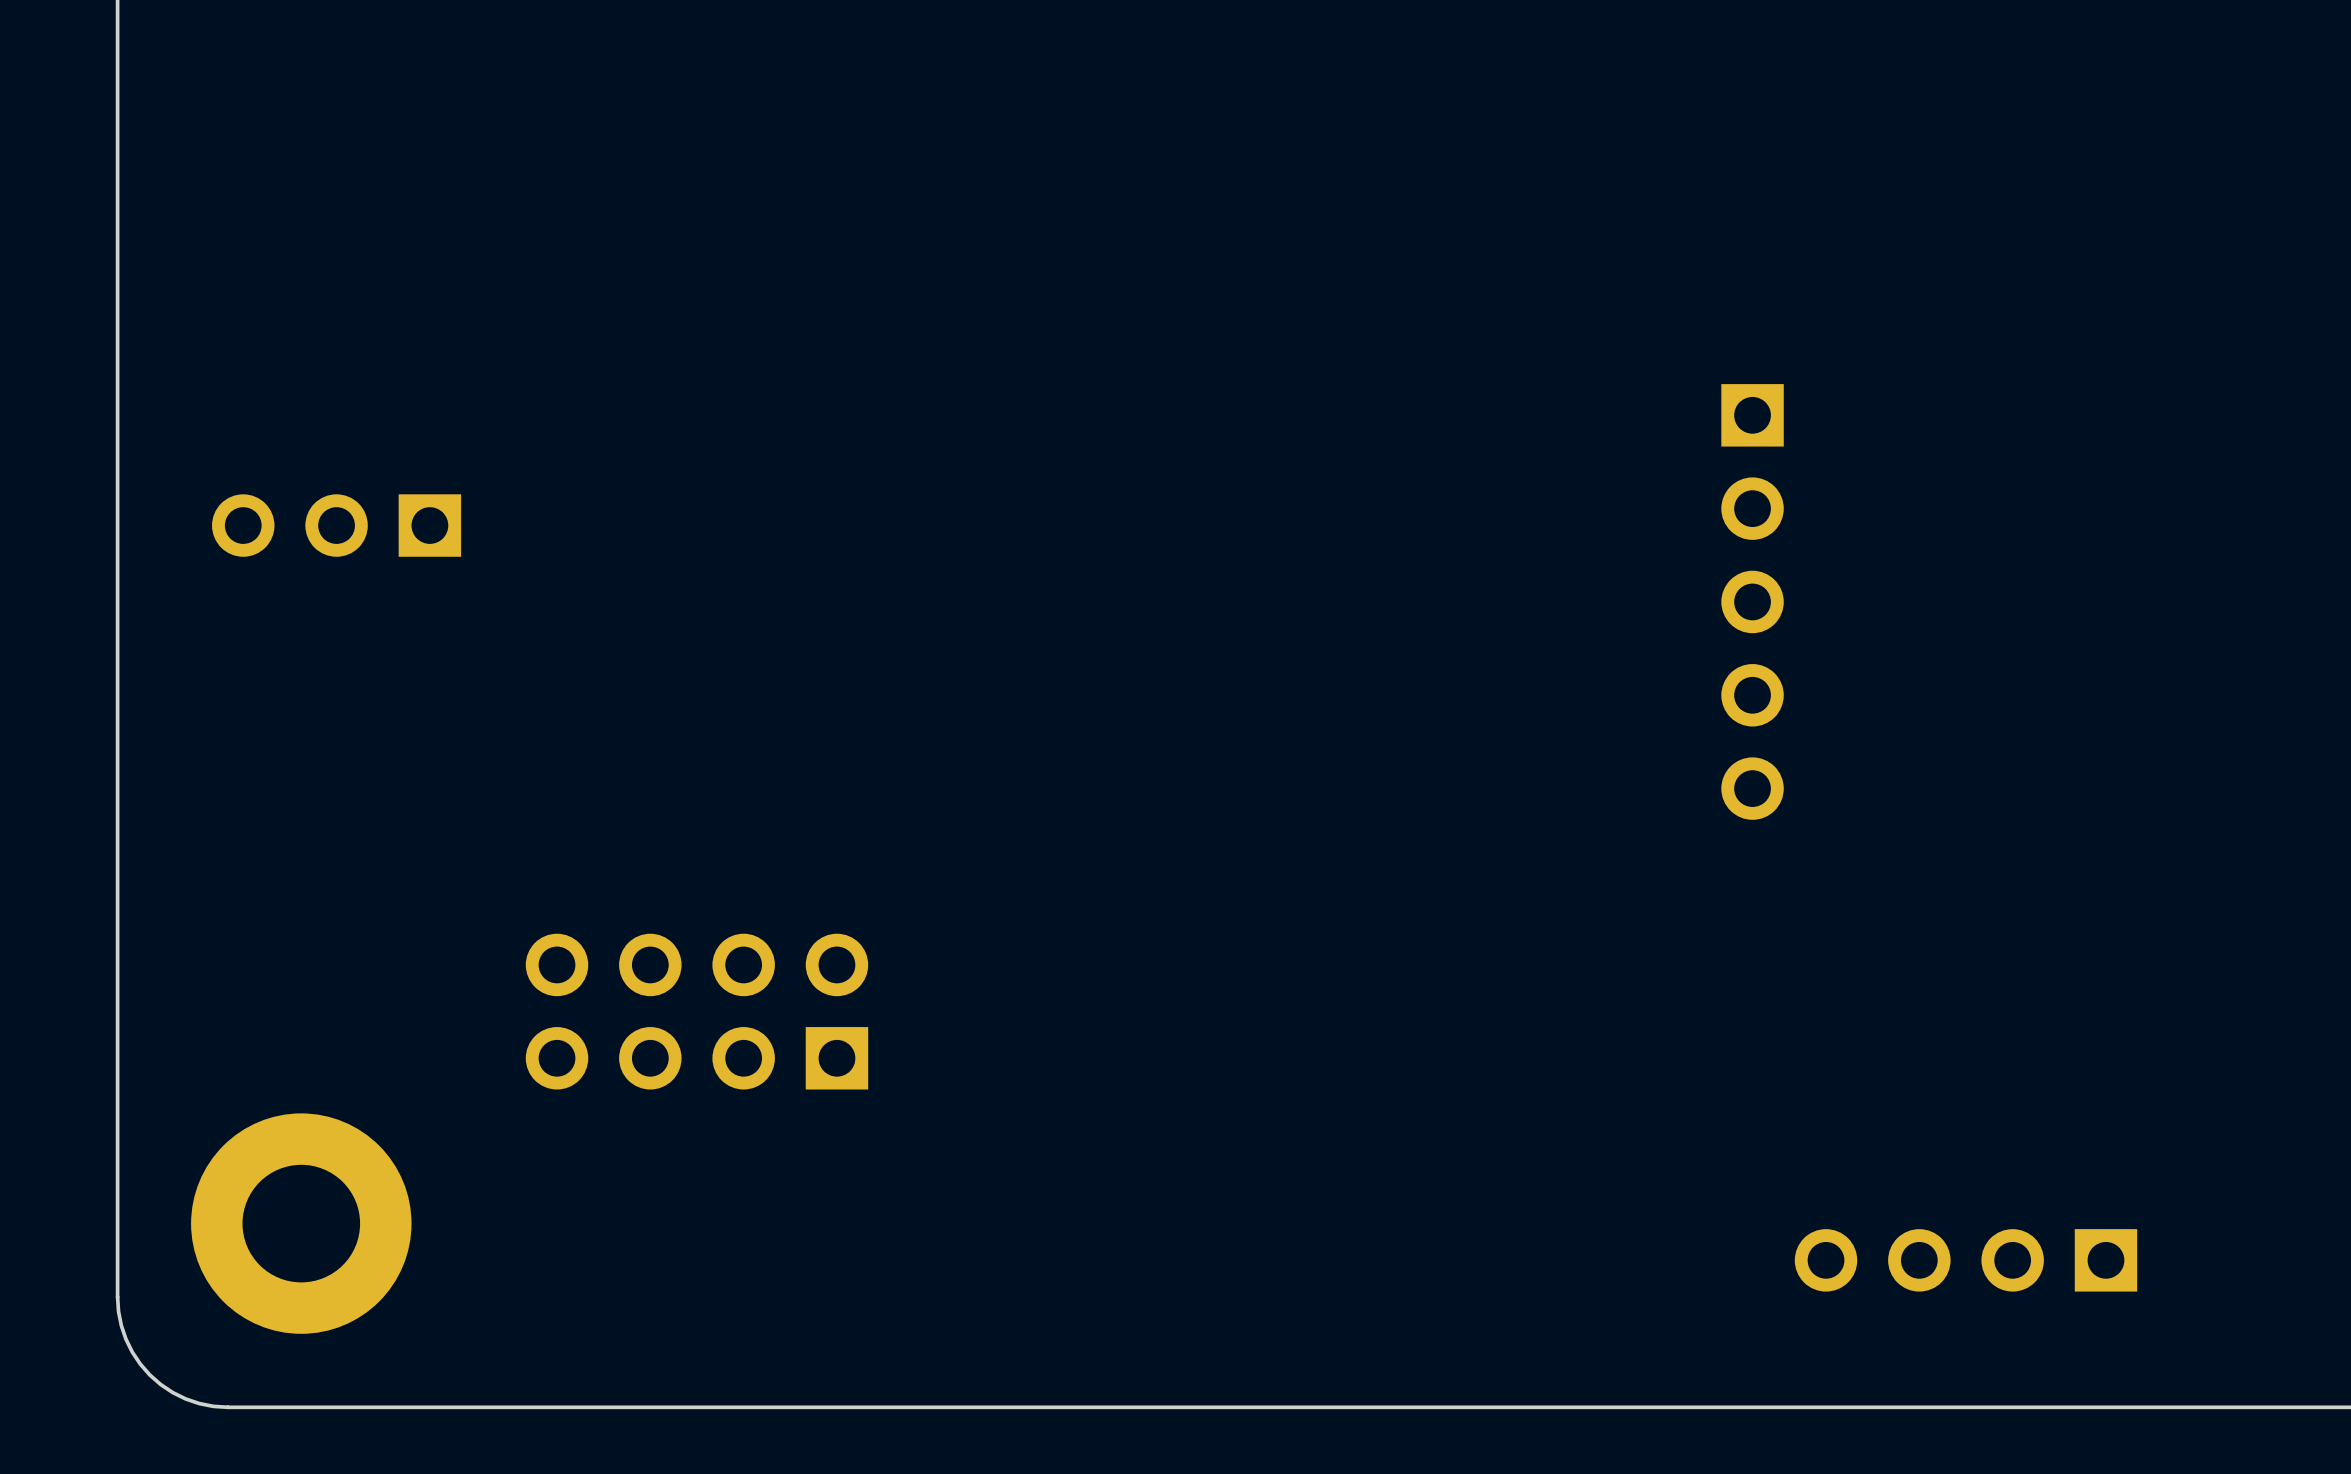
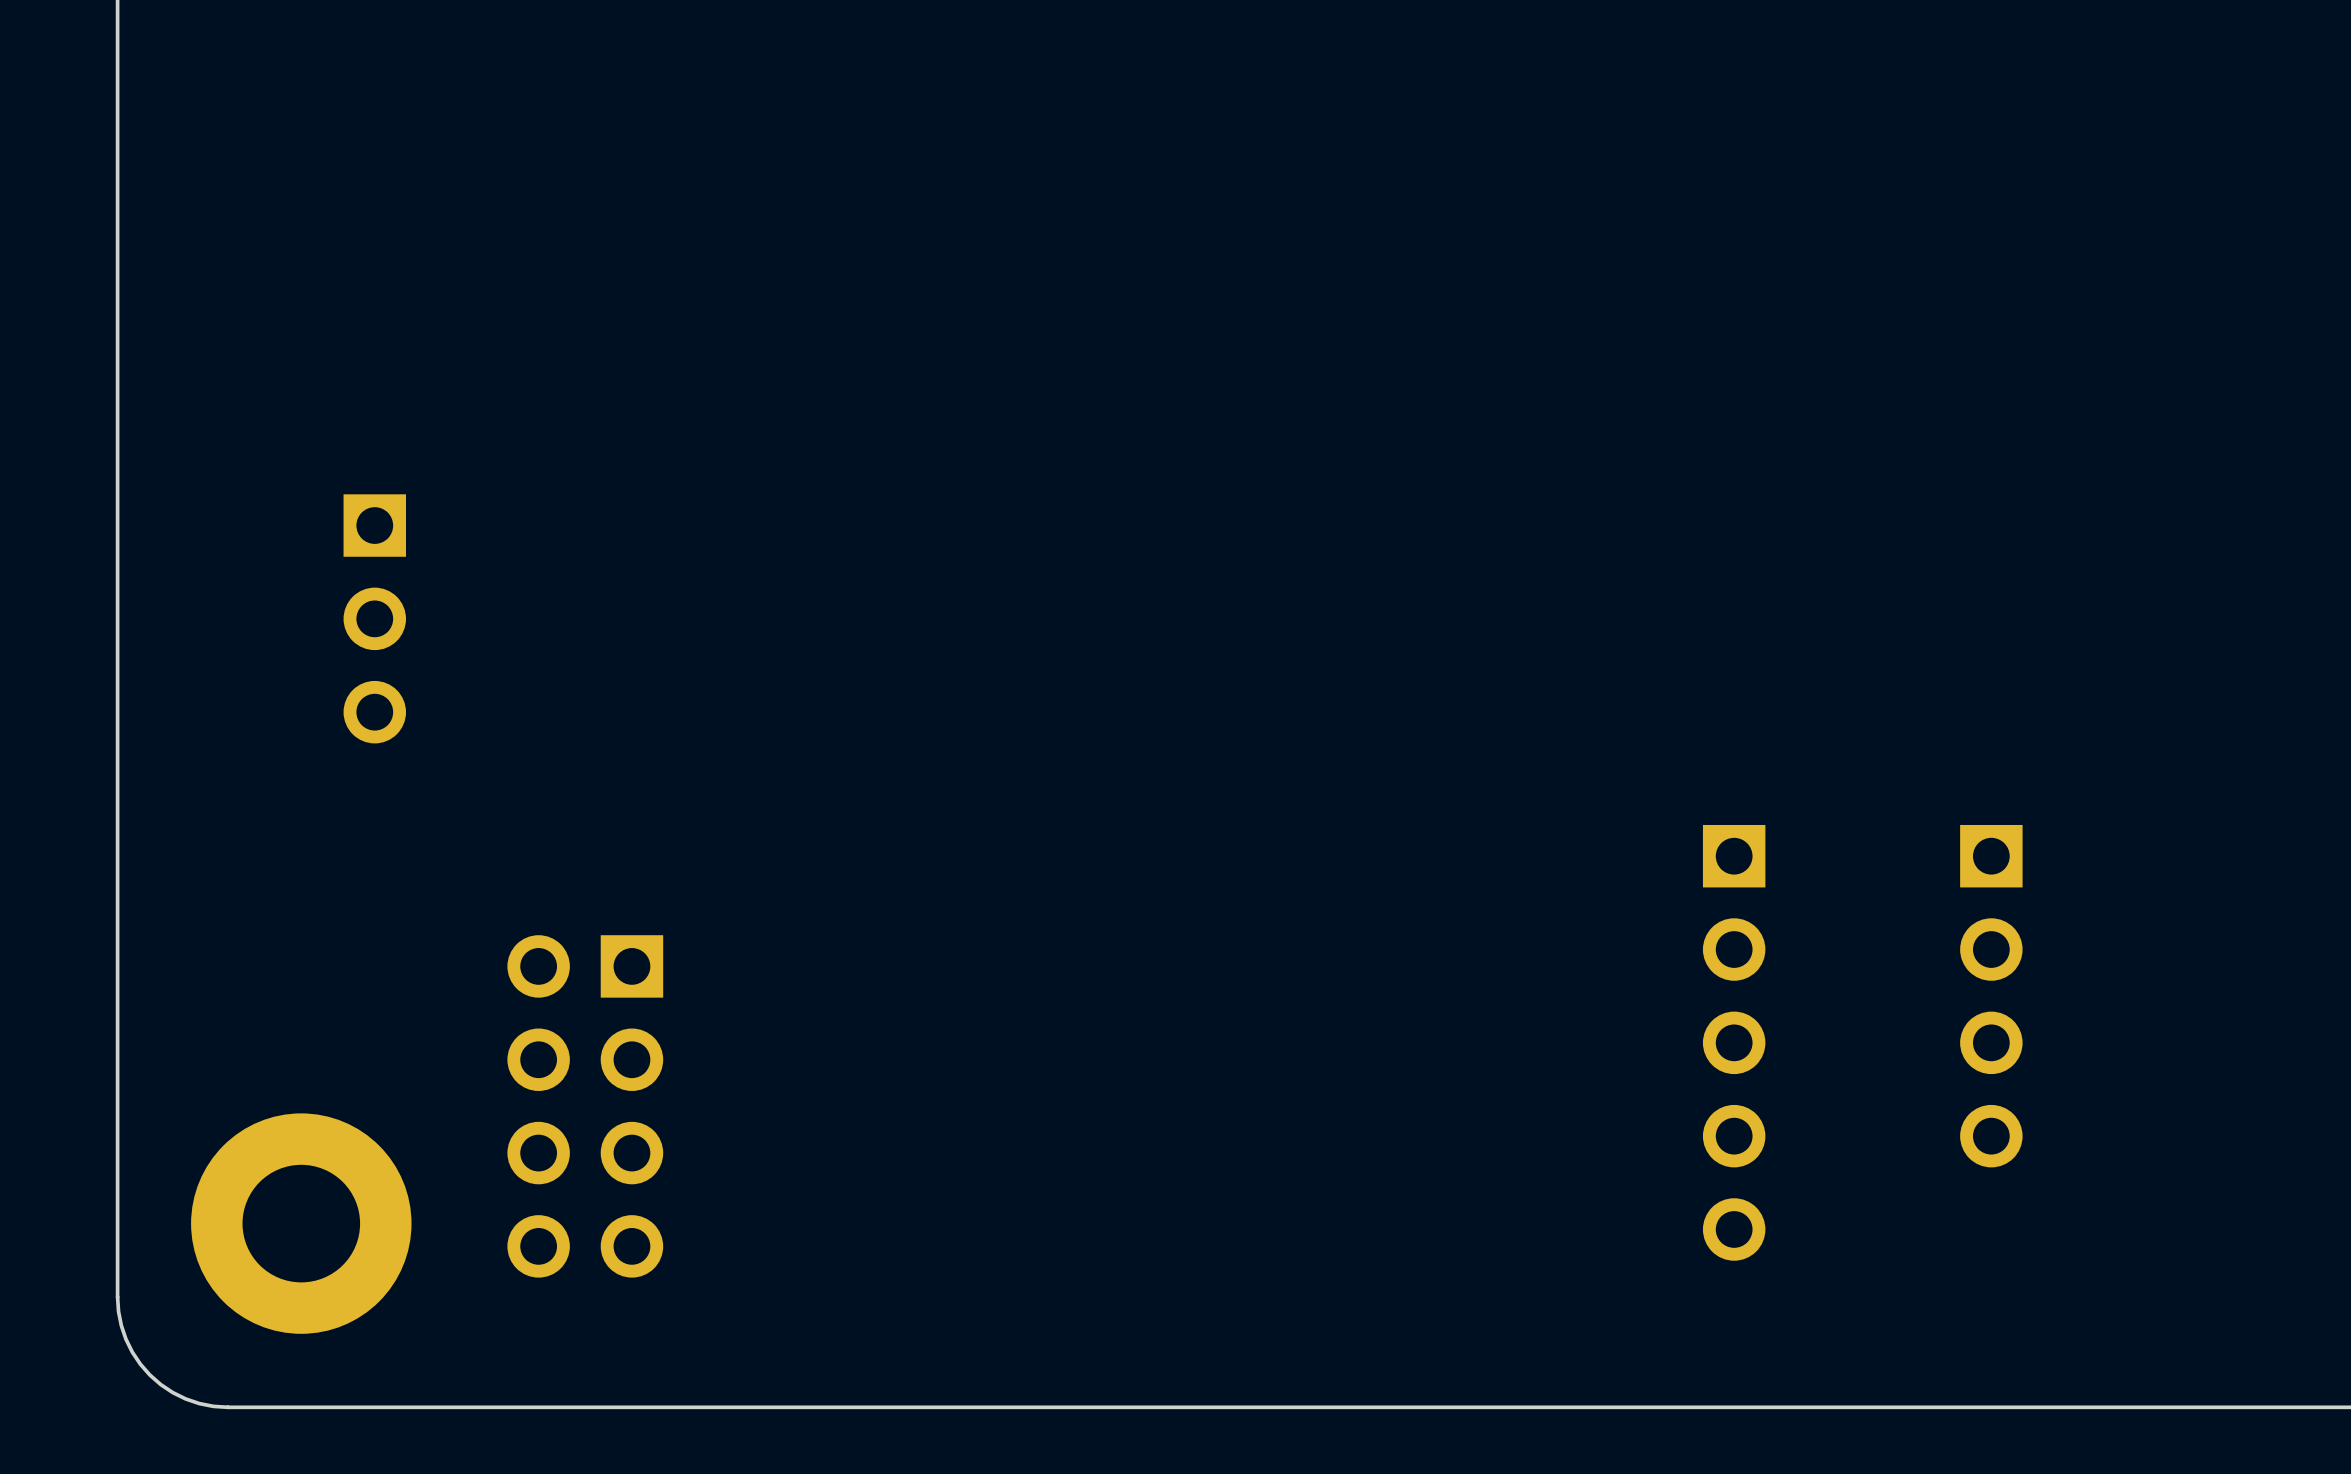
part rotation: 0° (336, 525) -> 90° counterclockwise (374, 618)
part position: (1752, 601) -> (1734, 1042)
part rotation: 0° (696, 1011) -> 90° counterclockwise (585, 1106)
part rotation: 0° (1966, 1260) -> 90° counterclockwise (1991, 996)
part position: (1966, 1260) -> (1991, 996)

